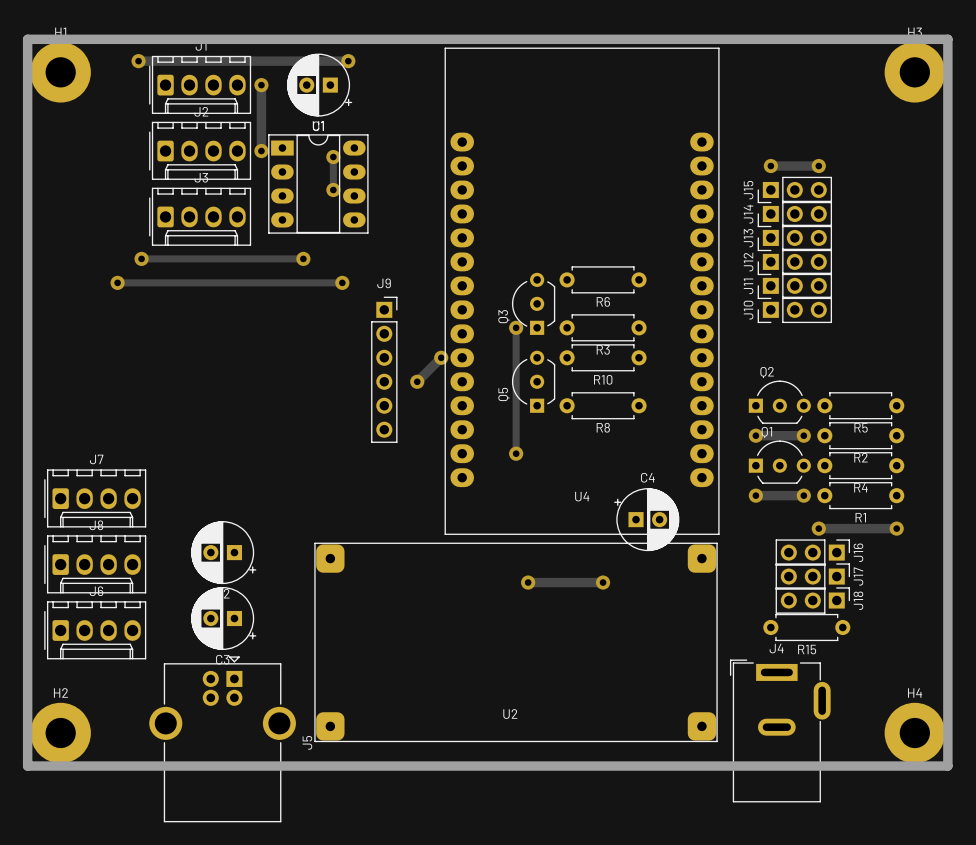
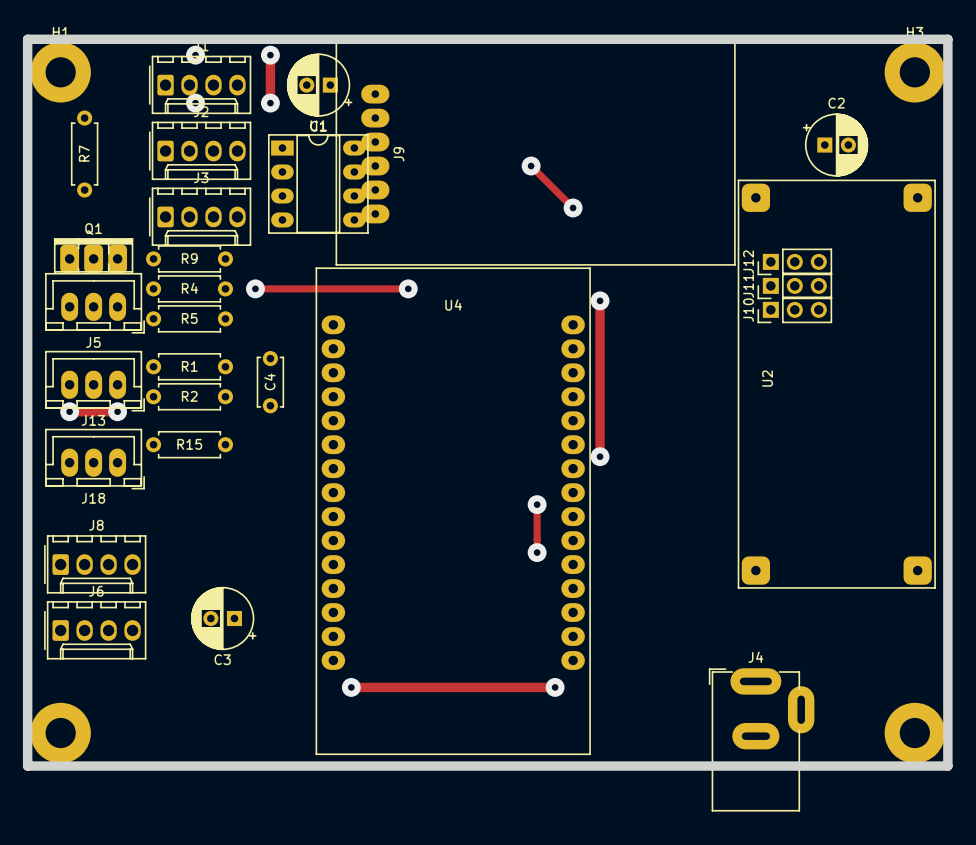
via: none -> (195, 55)
track: none -> (270, 55) (270, 103)
via: none -> (270, 55)
track: (138, 61) (348, 61) -> none
via: (138, 61) -> none
via: (348, 61) -> none
track: (261, 85) (261, 151) -> none
via: (261, 85) -> none
via: none -> (195, 103)
via: none -> (270, 103)
via: (261, 151) -> none
R7: none -> (84, 154)
track: (333, 157) (333, 189) -> none
via: (333, 157) -> none
track: none -> (531, 166) (573, 207)
via: none -> (531, 166)
track: (770, 166) (818, 166) -> none
via: (770, 166) -> none
via: (818, 166) -> none
via: (333, 189) -> none
J15: (794, 189) -> none
via: none -> (573, 207)
J14: (794, 213) -> none
J13 footprint: [757, 224, 832, 252] -> [45, 351, 145, 412]
J13 name position: J13 (748, 238) -> J13 (93, 420)
track: (141, 258) (303, 258) -> none
via: (141, 258) -> none
R9: none -> (189, 258)
via: (303, 258) -> none
R6: (603, 279) -> none
track: (117, 282) (342, 282) -> none
via: (117, 282) -> none
via: (342, 282) -> none
J9 name position: J9 (384, 283) -> J9 (398, 154)
track: none -> (255, 288) (408, 288)
via: none -> (255, 288)
via: none -> (408, 288)
U4 rotation: 0° (582, 291) -> 180° (453, 511)
J9 footprint: [371, 296, 398, 443] -> [335, 42, 736, 266]
track: none -> (600, 300) (600, 456)
via: none -> (600, 300)
Q3: (533, 303) -> none
via: (516, 327) -> none
R3: (603, 327) -> none
track: (516, 333) (516, 453) -> none
track: (441, 357) (417, 381) -> none
via: (441, 357) -> none
R10: (603, 357) -> none
via: (417, 381) -> none
Q5: (533, 381) -> none
Q2: (779, 402) -> none
R8: (603, 405) -> none
R5 position: (860, 405) -> (189, 318)
track: none -> (69, 411) (117, 411)
via: none -> (69, 411)
via: none -> (117, 411)
R5 name position: R5 (861, 427) -> R5 (189, 318)
track: (755, 435) (803, 435) -> none
via: (755, 435) -> none
via: (803, 435) -> none
R2 position: (860, 435) -> (189, 396)
Q1 footprint: [748, 440, 811, 484] -> [54, 238, 134, 274]
via: (516, 453) -> none
via: none -> (600, 456)
R2 name position: R2 (861, 457) -> R2 (189, 396)
R4 position: (860, 465) -> (189, 288)
C4 name position: C4 (647, 477) -> C4 (269, 381)
R4 name position: R4 (860, 487) -> R4 (189, 288)
C4 footprint: [614, 488, 680, 552] -> [256, 351, 284, 414]
track: (755, 495) (803, 495) -> none
via: (755, 495) -> none
via: (803, 495) -> none
R1 position: (860, 495) -> (189, 366)
J7: (95, 498) -> none
track: none -> (537, 504) (537, 552)
via: none -> (537, 504)
R1 name position: R1 (860, 517) -> R1 (189, 366)
track: (818, 528) (896, 528) -> none
via: (818, 528) -> none
via: (896, 528) -> none
U2 footprint: [314, 542, 718, 743] -> [737, 179, 936, 589]
C2 rotation: 0° (223, 552) -> 180° (835, 145)
C2 position: (223, 552) -> (835, 145)
via: none -> (537, 552)
J16: (812, 552) -> none
J17: (812, 576) -> none
track: (528, 582) (603, 582) -> none
via: (528, 582) -> none
via: (603, 582) -> none
J18 footprint: [775, 587, 850, 614] -> [45, 428, 145, 490]
J18 name position: J18 (858, 600) -> J18 (93, 498)
R15 position: (806, 627) -> (189, 444)
R15 name position: R15 (807, 649) -> R15 (189, 444)
J5 footprint: [149, 656, 296, 823] -> [45, 273, 145, 334]
J4 footprint: [730, 659, 831, 803] -> [709, 668, 815, 812]
track: none -> (351, 687) (555, 687)
via: none -> (351, 687)
via: none -> (555, 687)
H2 name: H2 (60, 692) -> none
H4 name: H4 (915, 693) -> none
U2 name position: U2 (510, 714) -> U2 (767, 378)
J5 name position: J5 (307, 742) -> J5 (93, 342)

